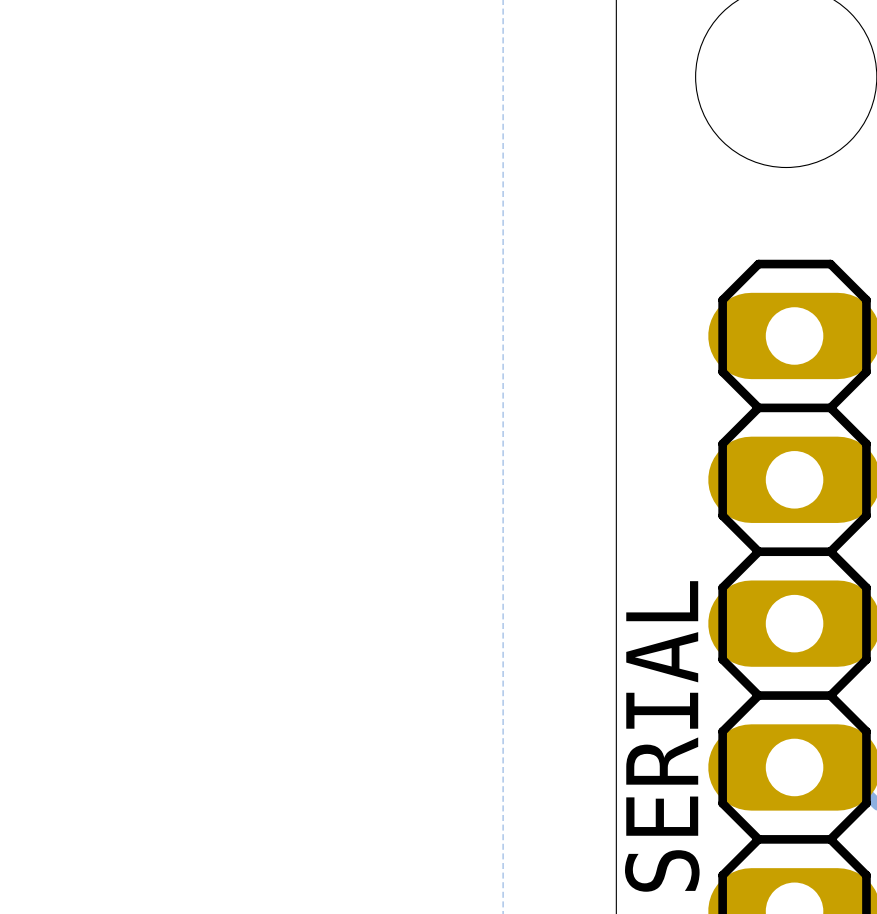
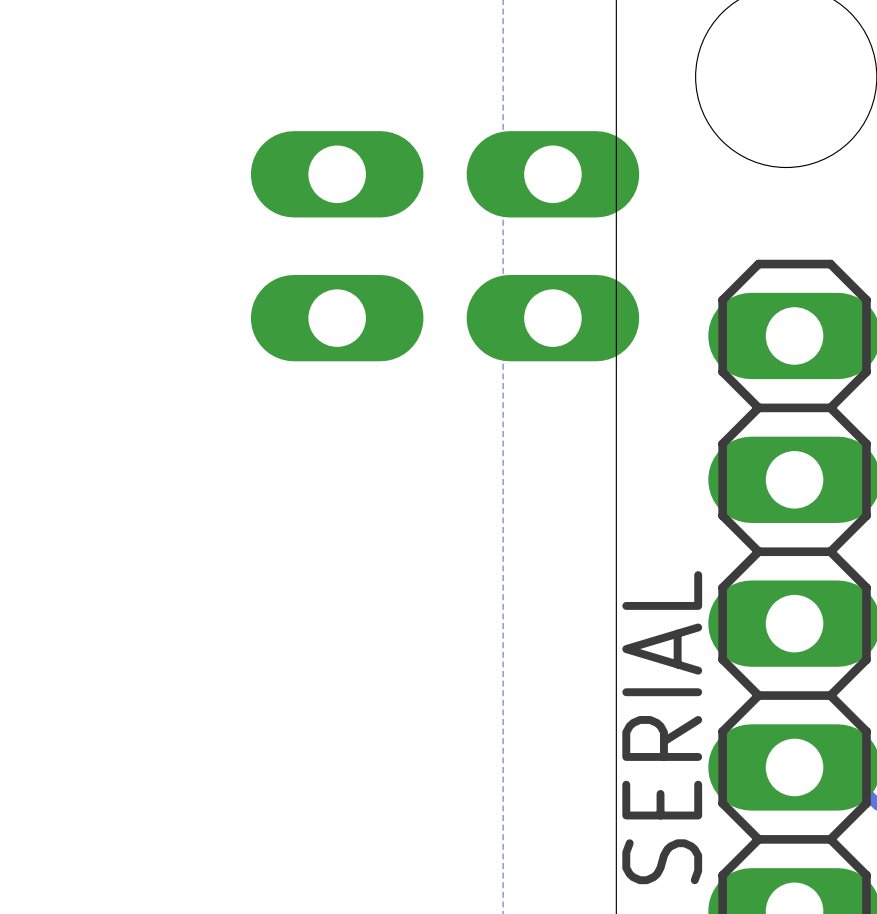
part: none -> (337, 246)
part: none -> (552, 246)

